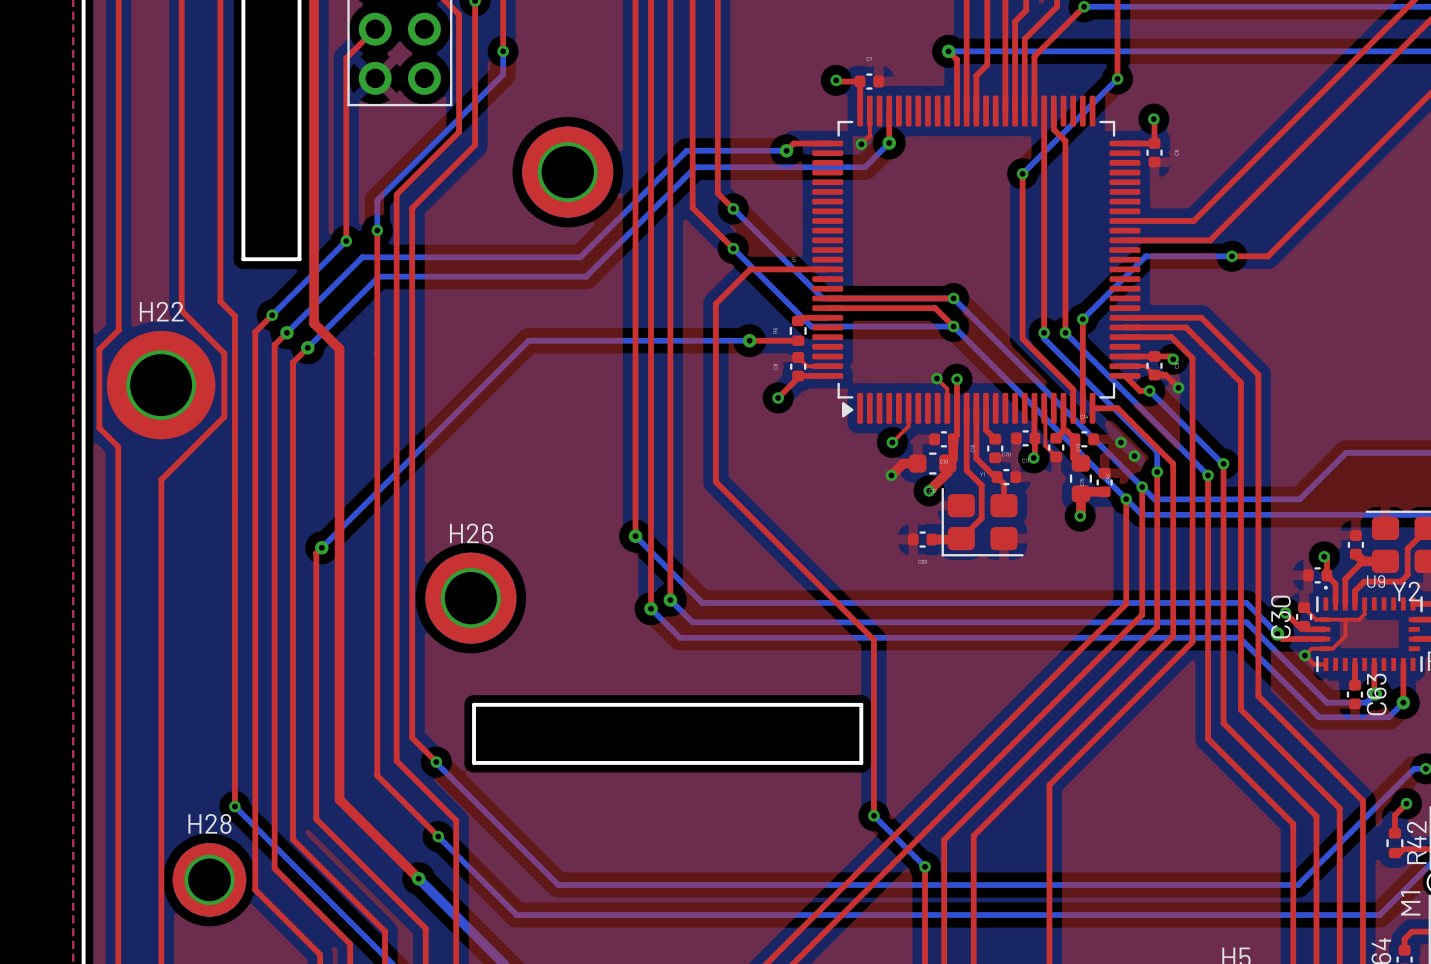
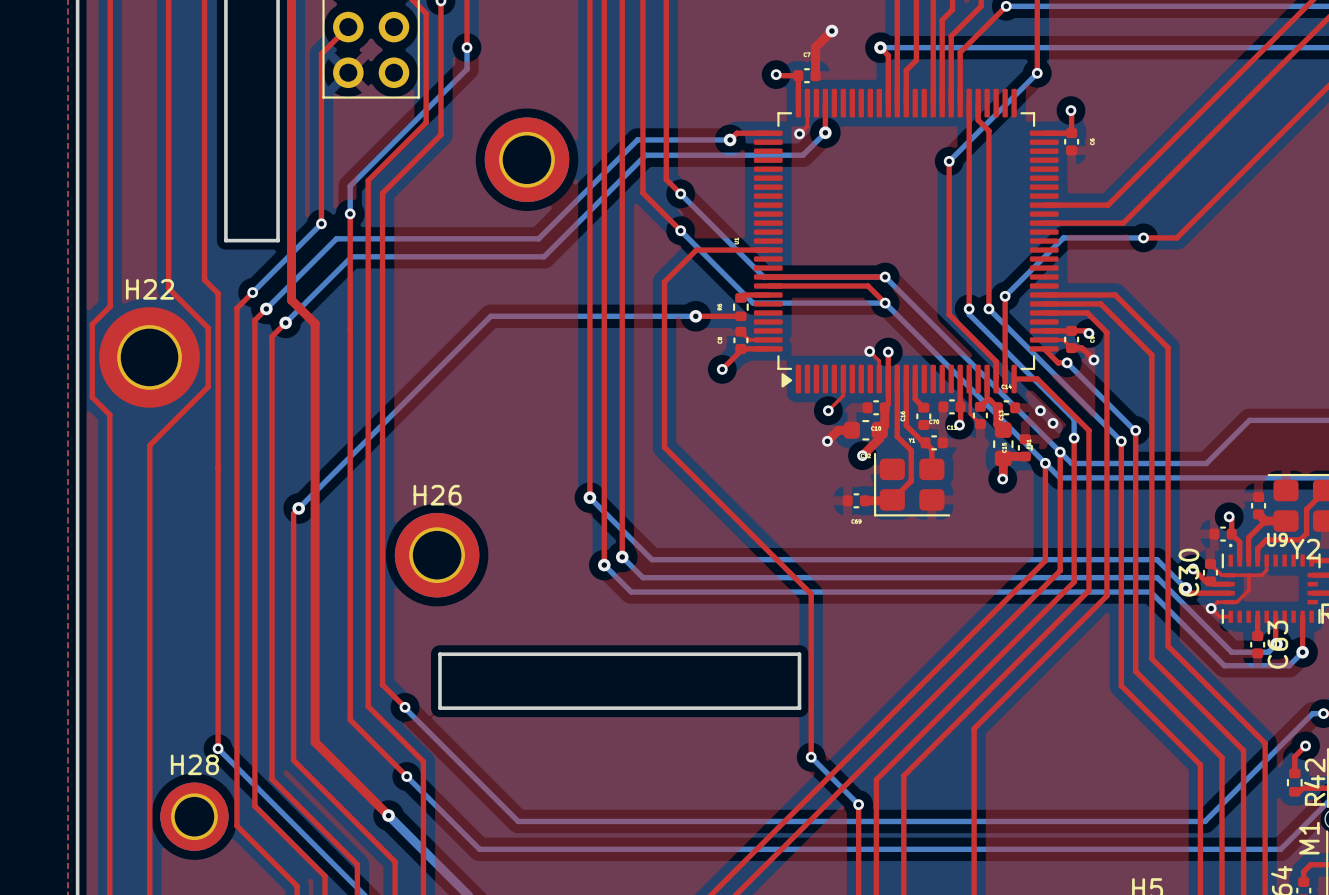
top track: none -> (831, 31) (815, 47) (815, 75)
via: none -> (831, 31)

